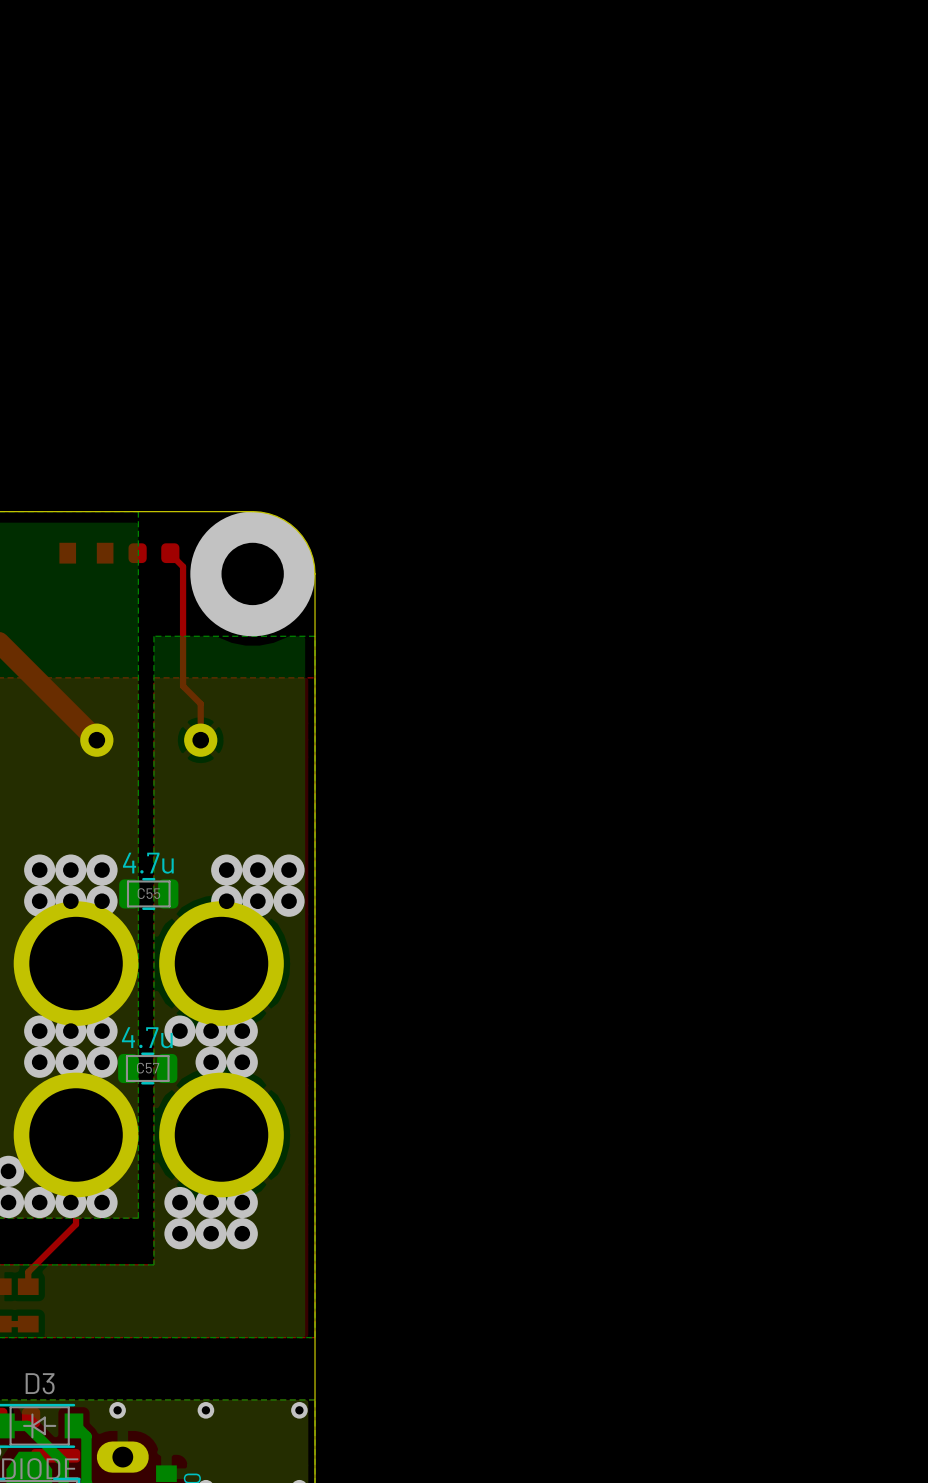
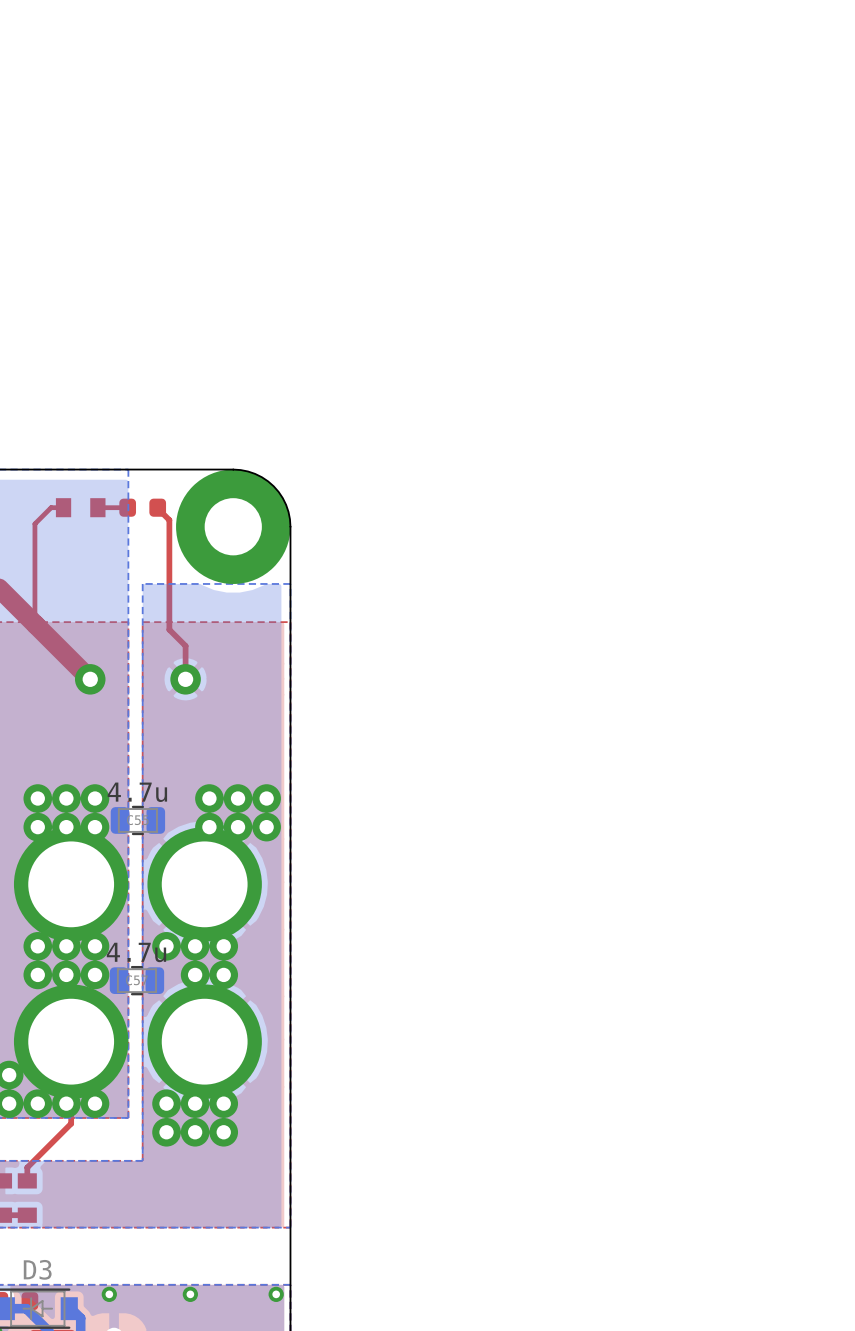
top track: none -> (63, 507) (51, 507) (34, 523) (35, 624)
top track: none -> (127, 507) (97, 507)

